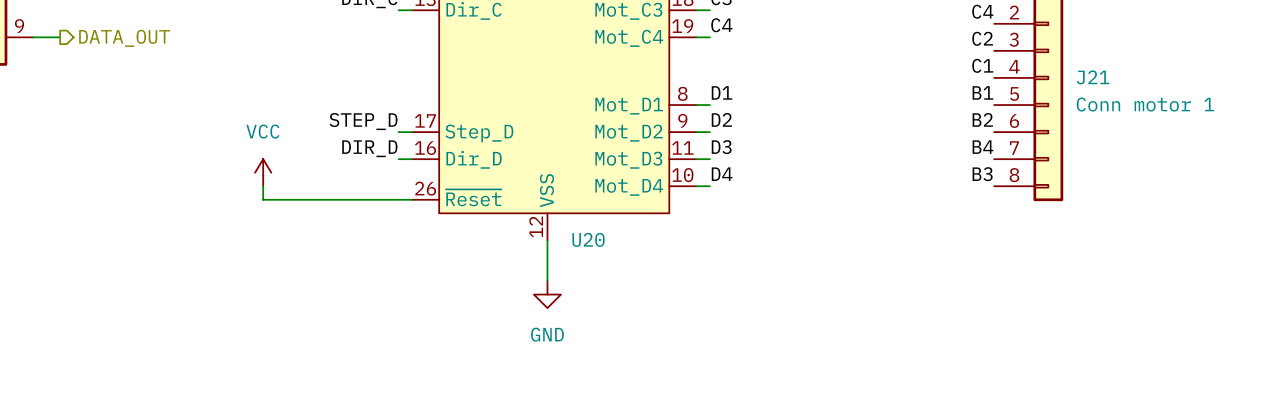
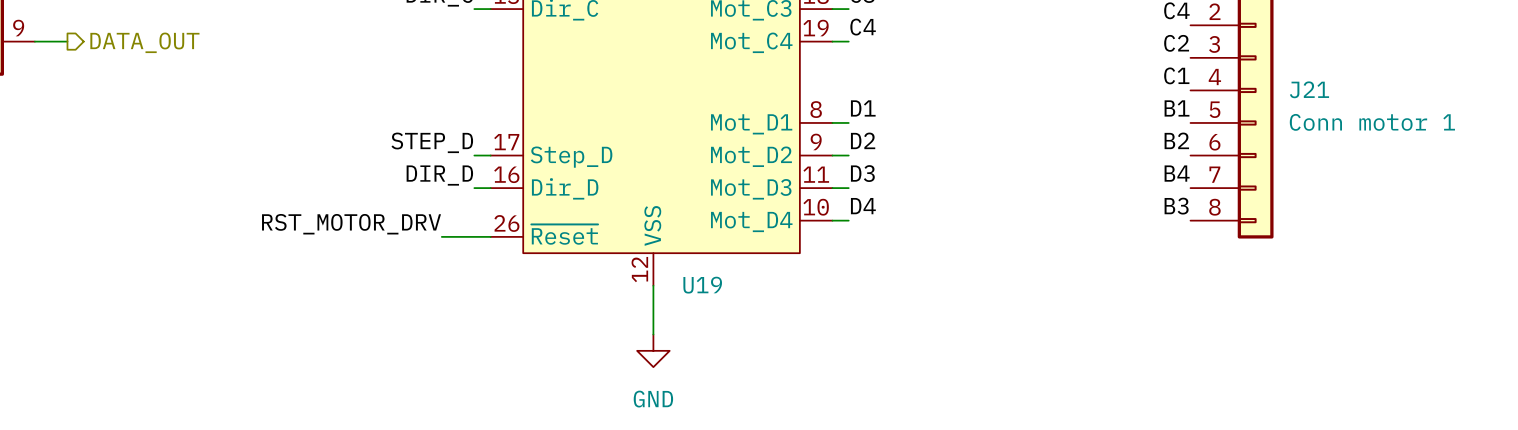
power symbol: VCC (263, 172) -> none
wire: (263, 186) (263, 199) (371, 199) -> none
label: none -> RST_MOTOR_DRV (351, 224)
U20 name: U20 (588, 239) -> U19 (702, 285)

